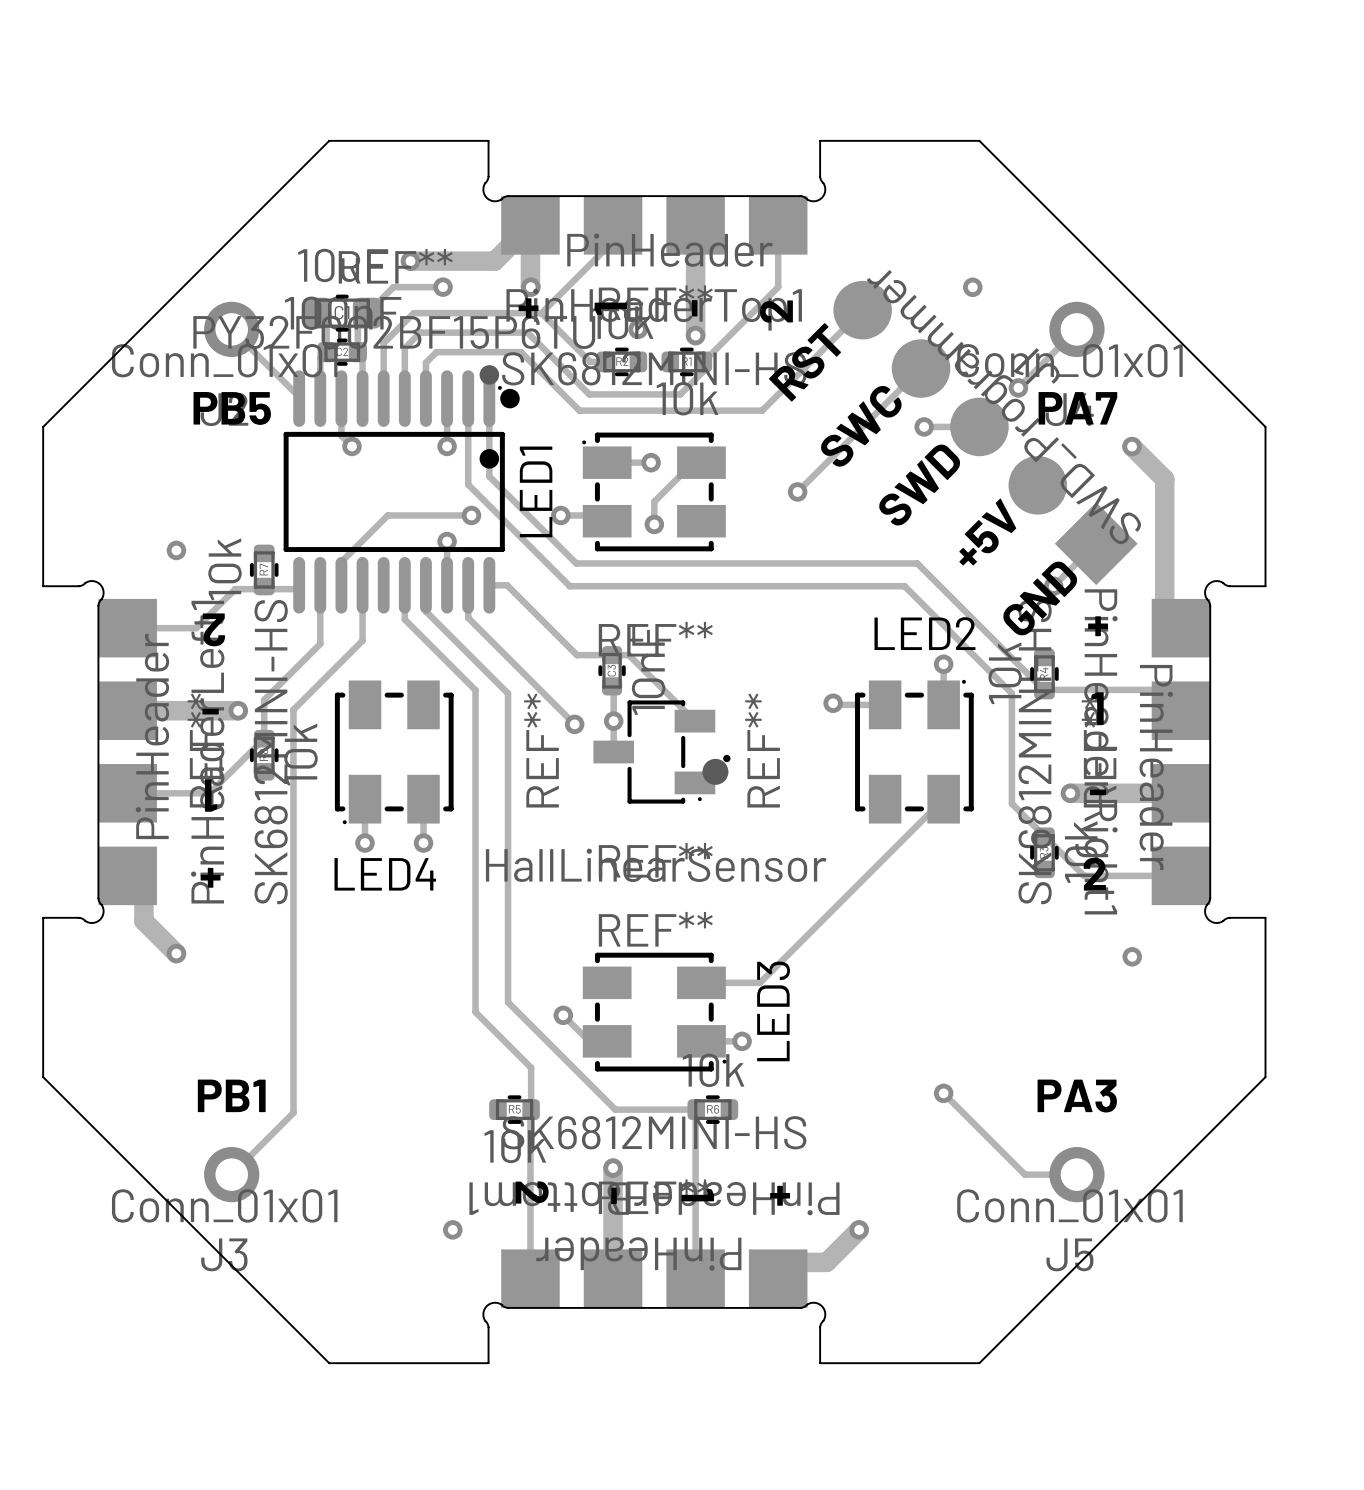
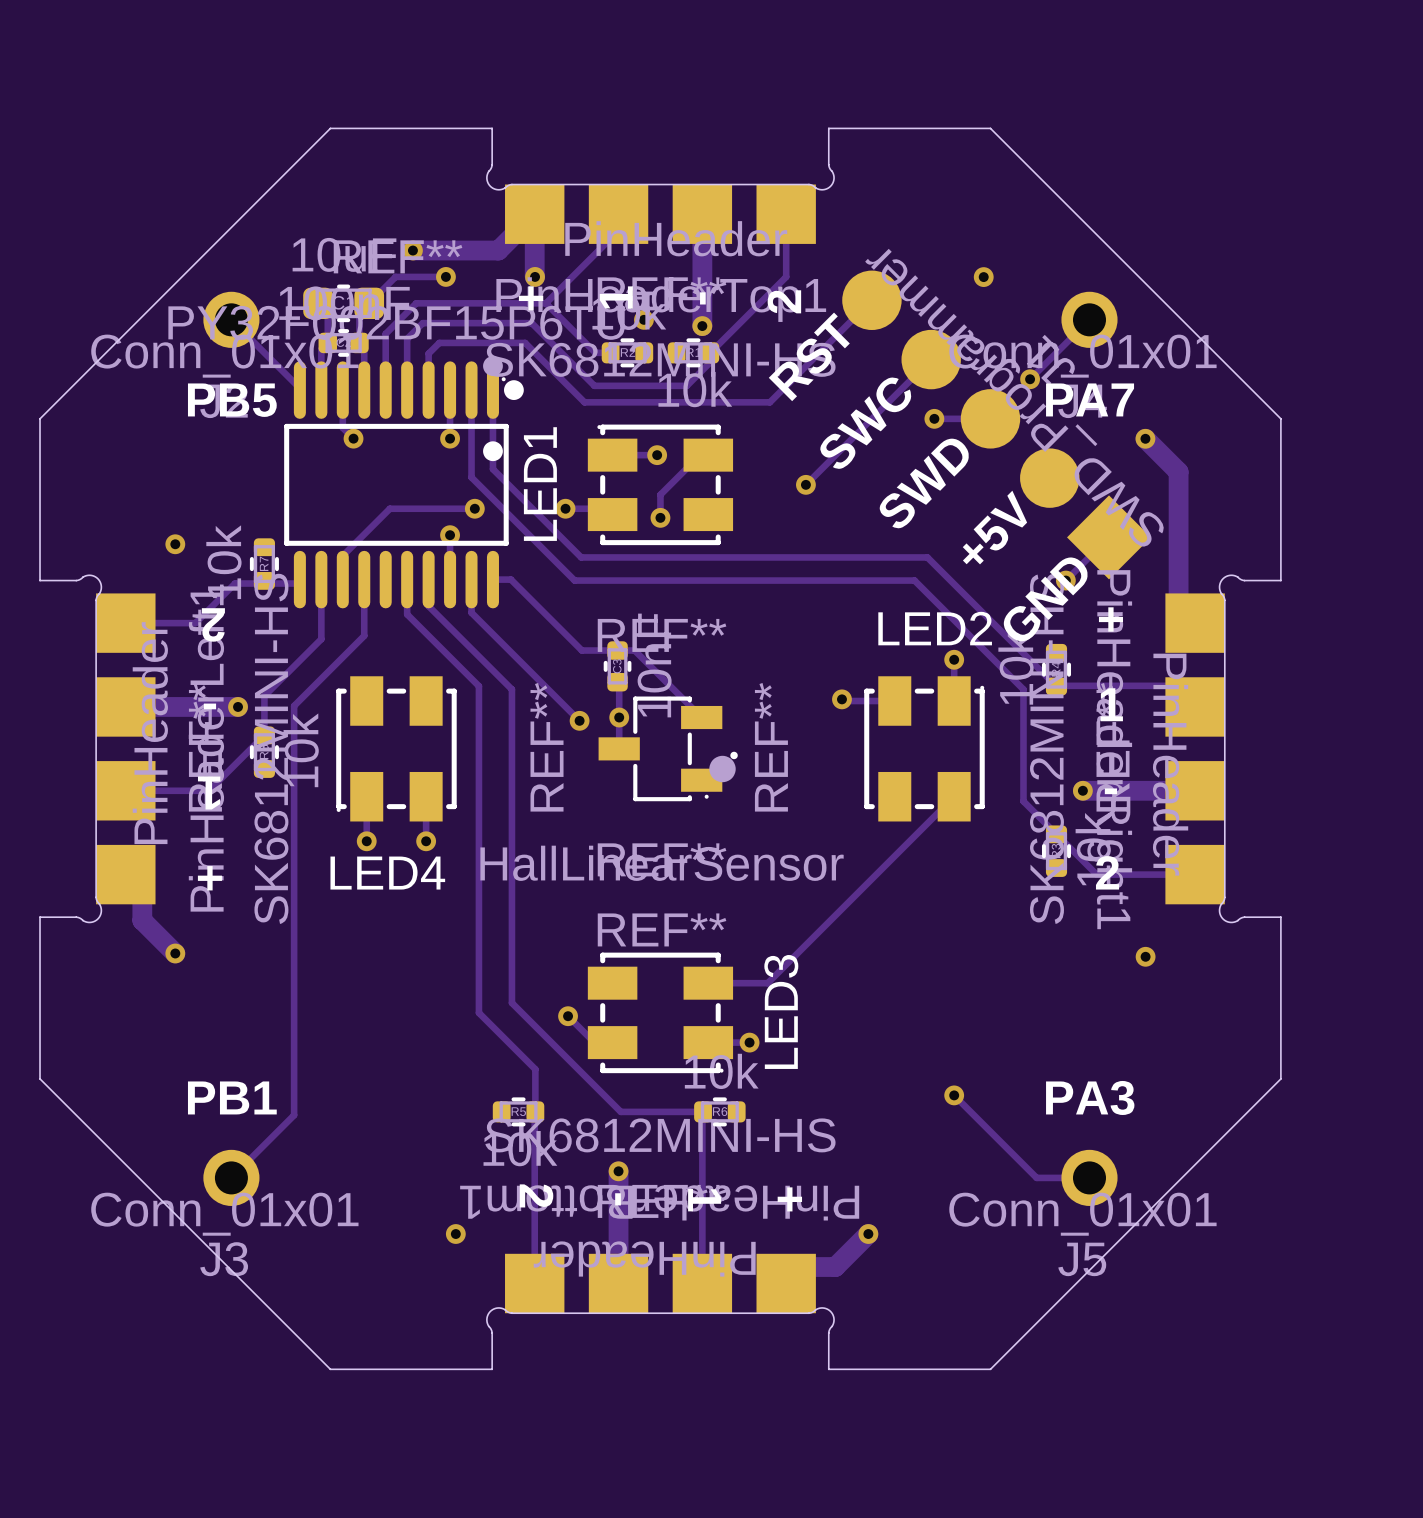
part footprint: [582, 432, 726, 552] -> [587, 424, 734, 546]
part footprint: [855, 679, 974, 824] -> [864, 676, 985, 822]
part footprint: [334, 680, 454, 825] -> [336, 676, 457, 822]
part footprint: [582, 952, 727, 1072] -> [587, 952, 734, 1074]

